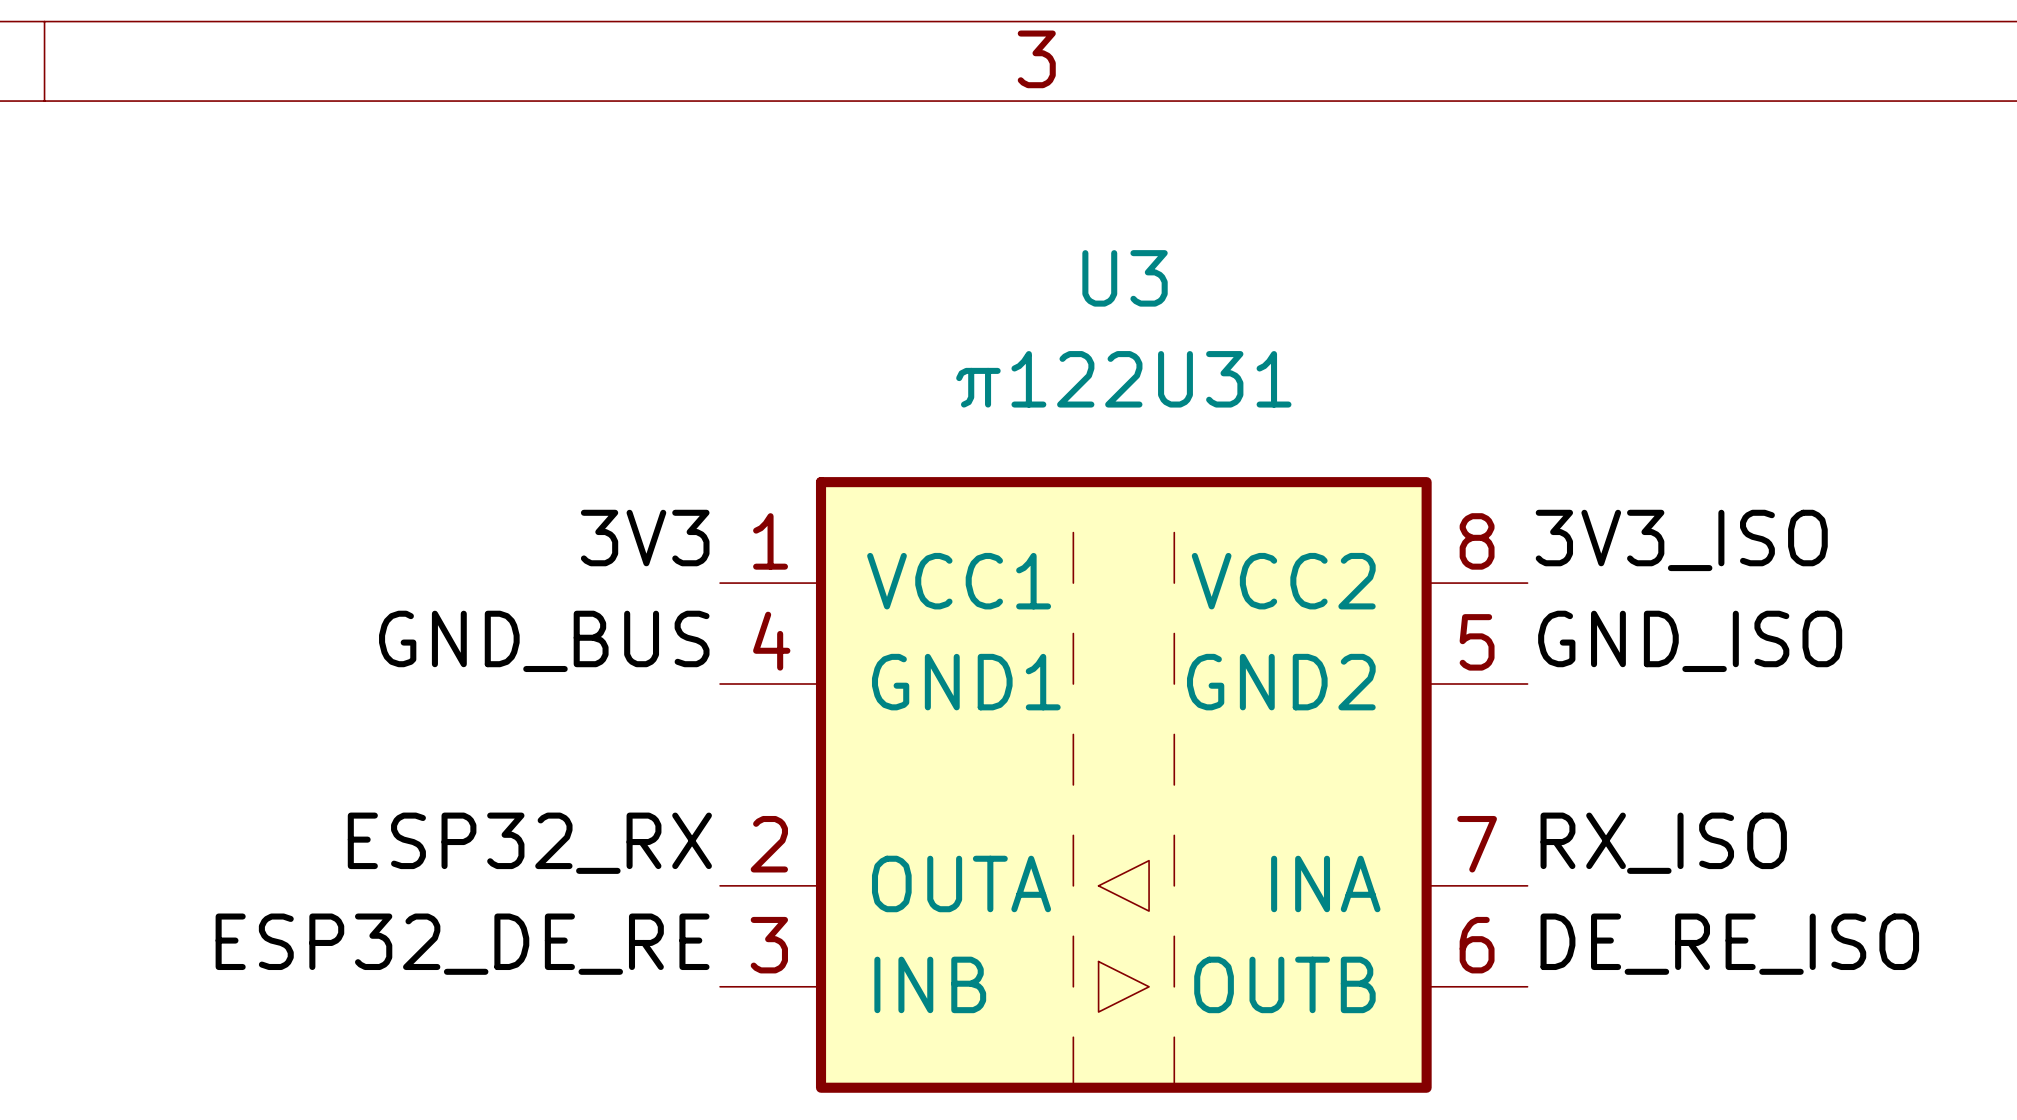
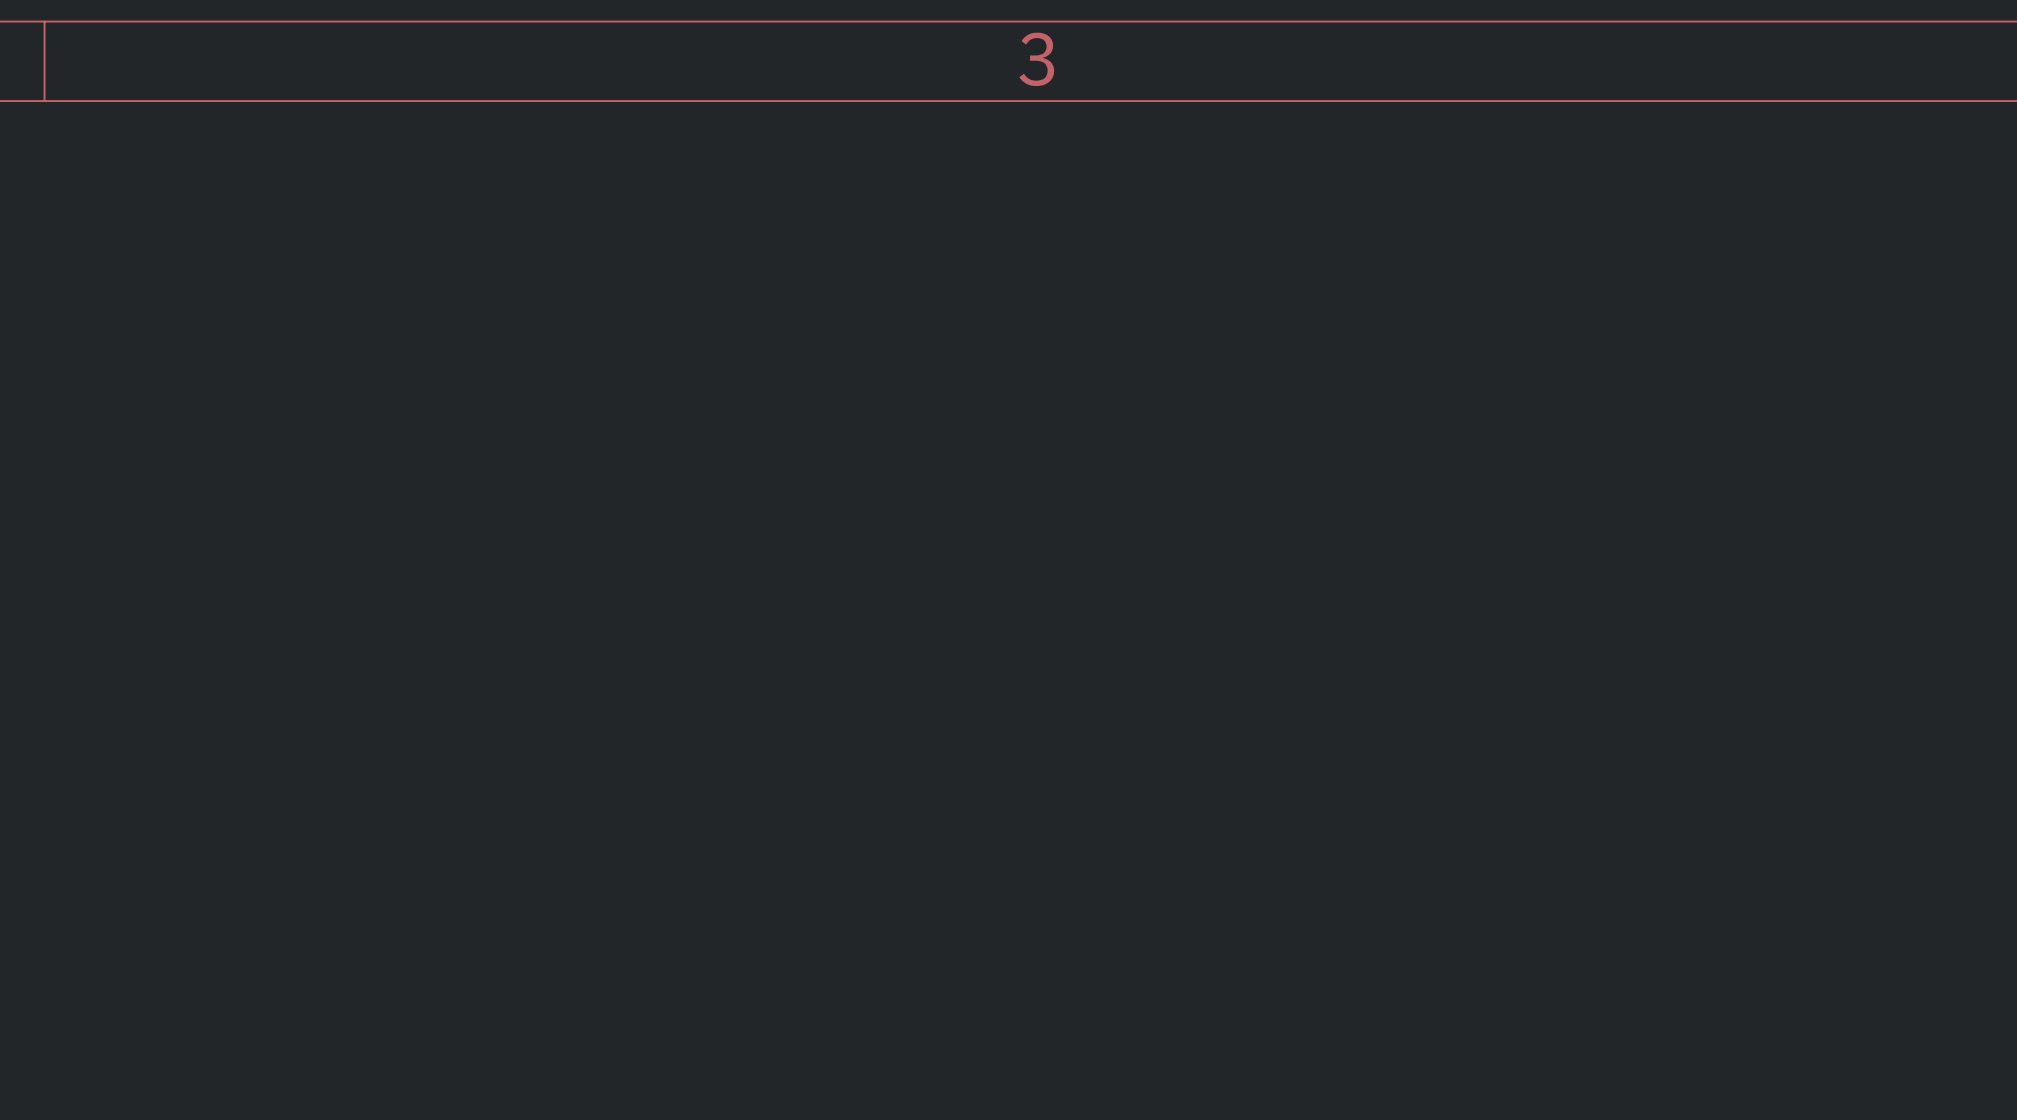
label: 3V3 (645, 538) -> none
label: 3V3_ISO (1681, 540) -> none
label: GND_BUS (544, 641) -> none
label: GND_ISO (1690, 641) -> none
U3: π122U31 (1123, 784) -> none
label: ESP32_RX (529, 843) -> none
label: RX_ISO (1663, 843) -> none
label: ESP32_DE_RE (462, 944) -> none
label: DE_RE_ISO (1729, 944) -> none

